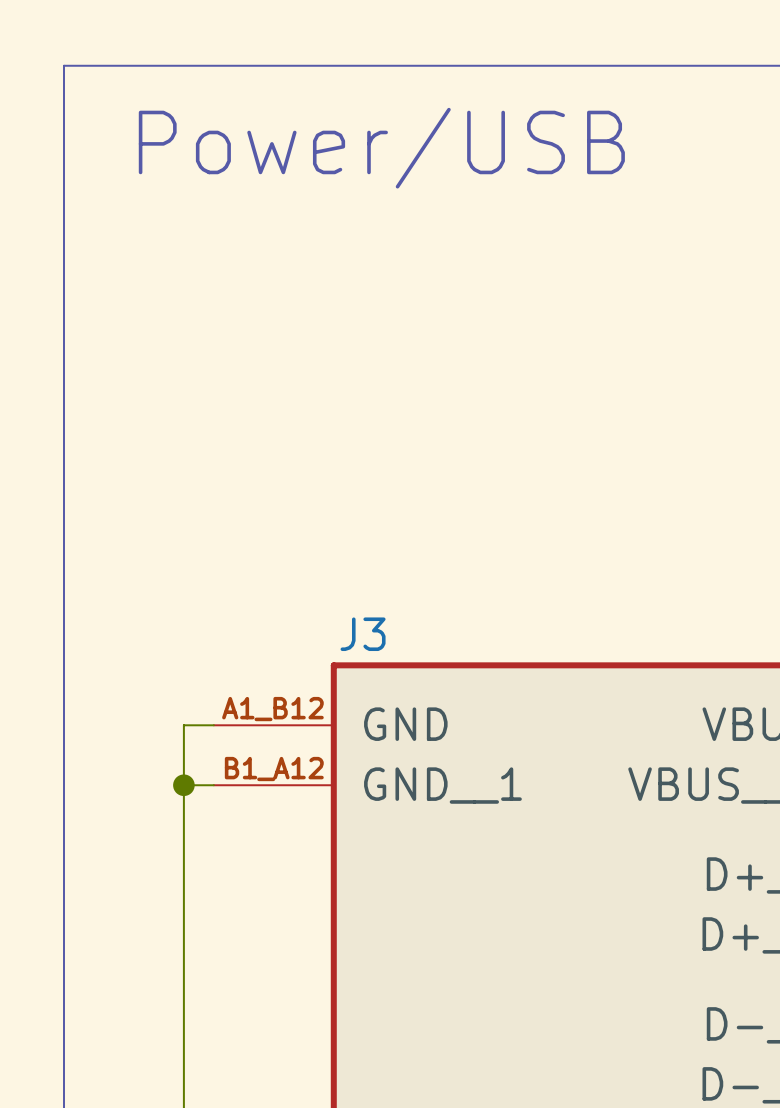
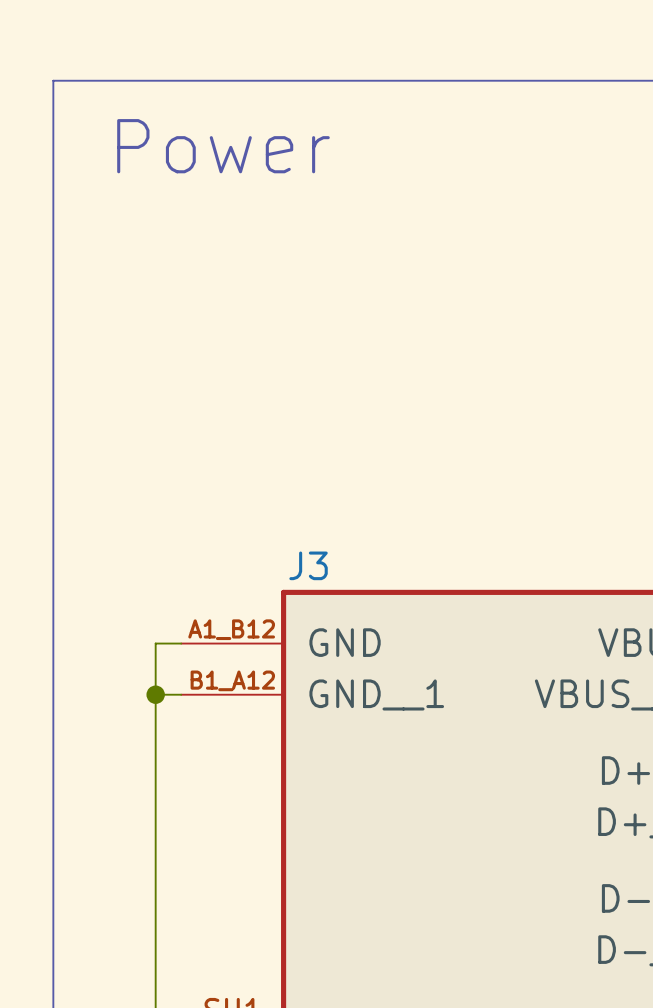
text: Power/USB (381, 148) -> Power (223, 146)

